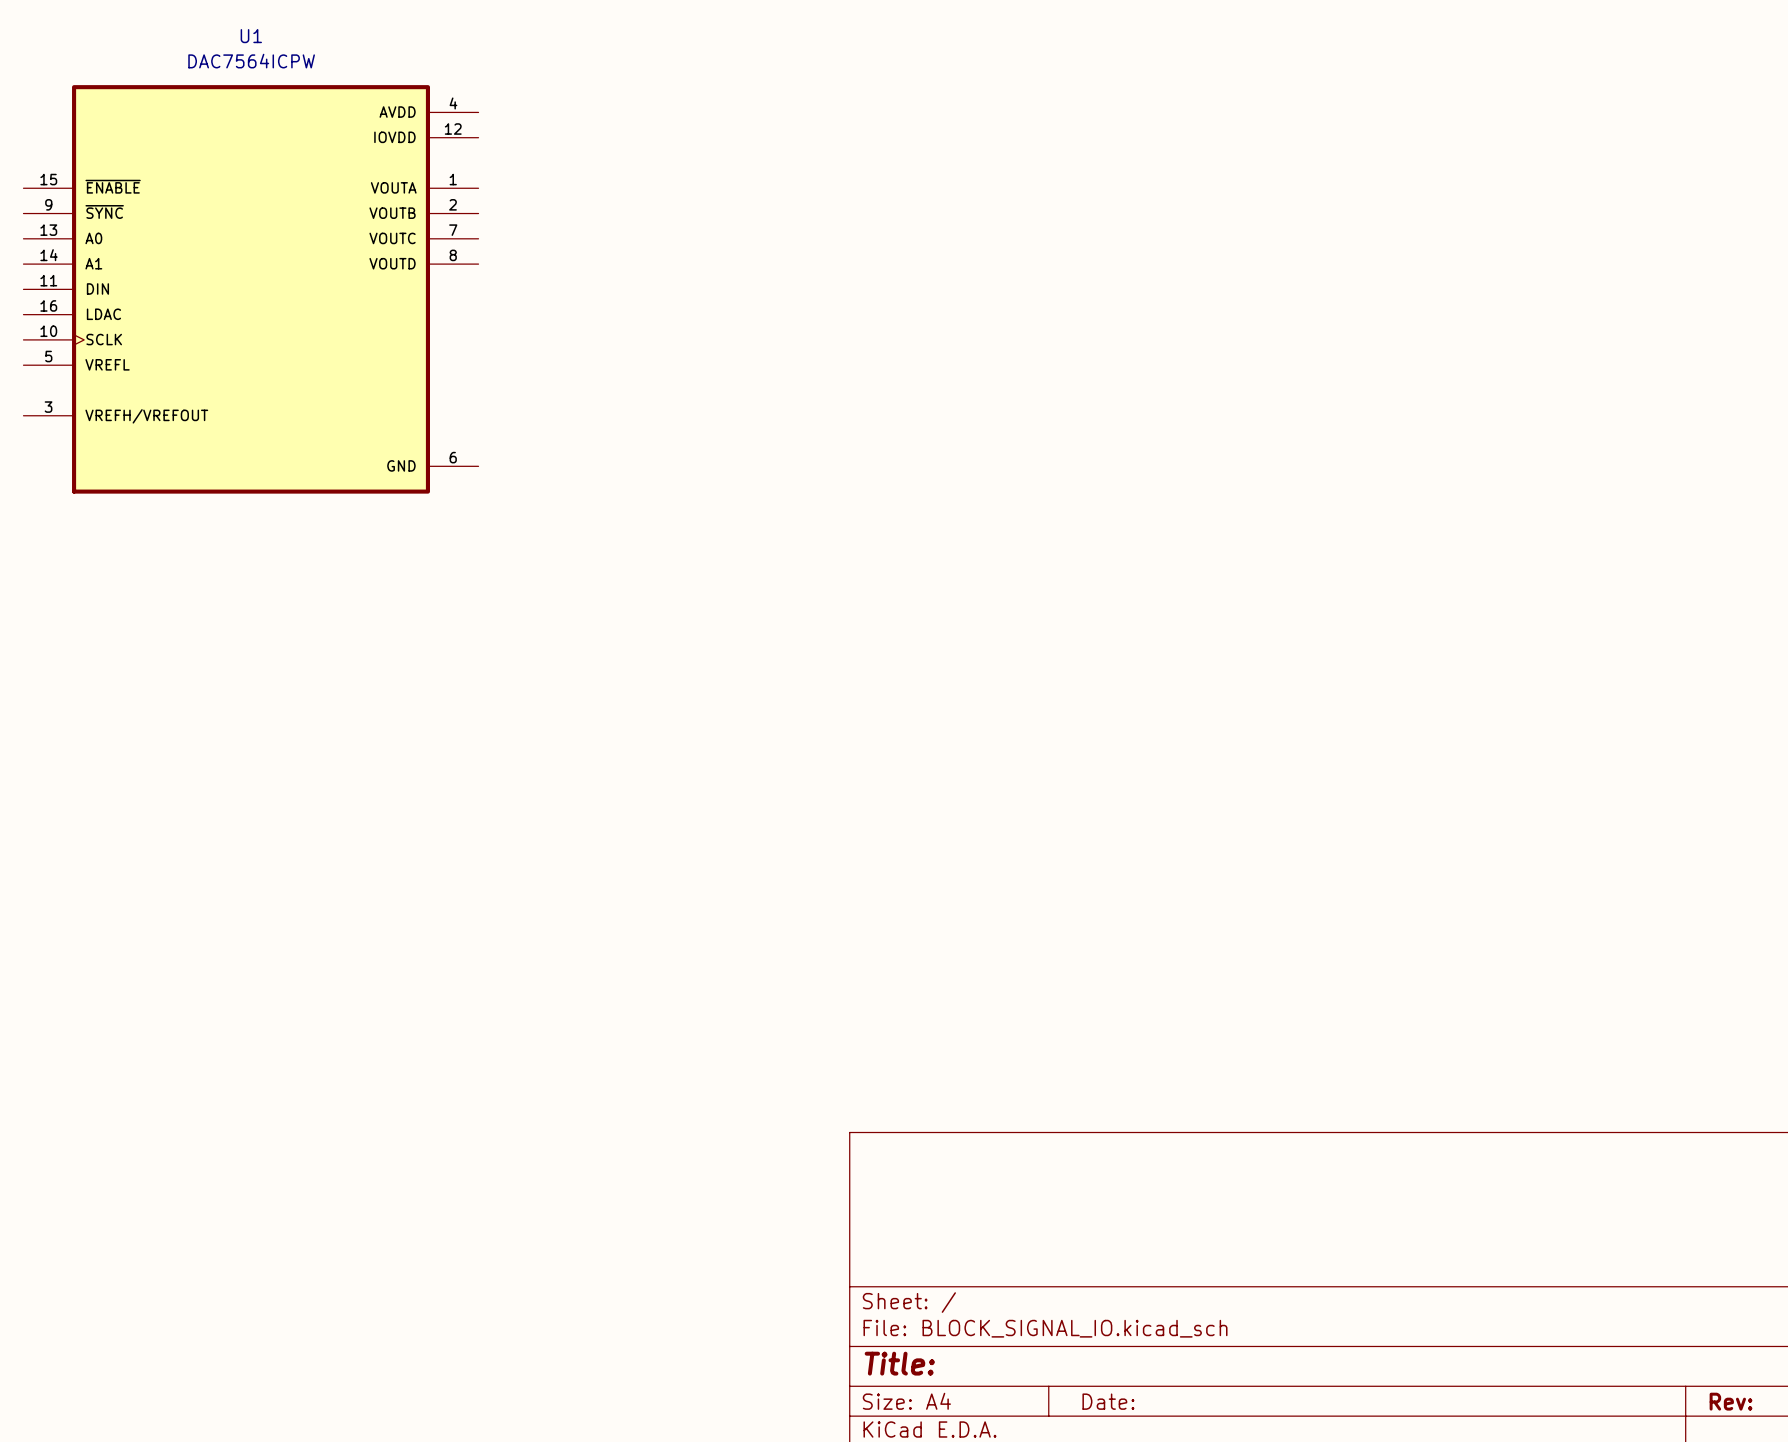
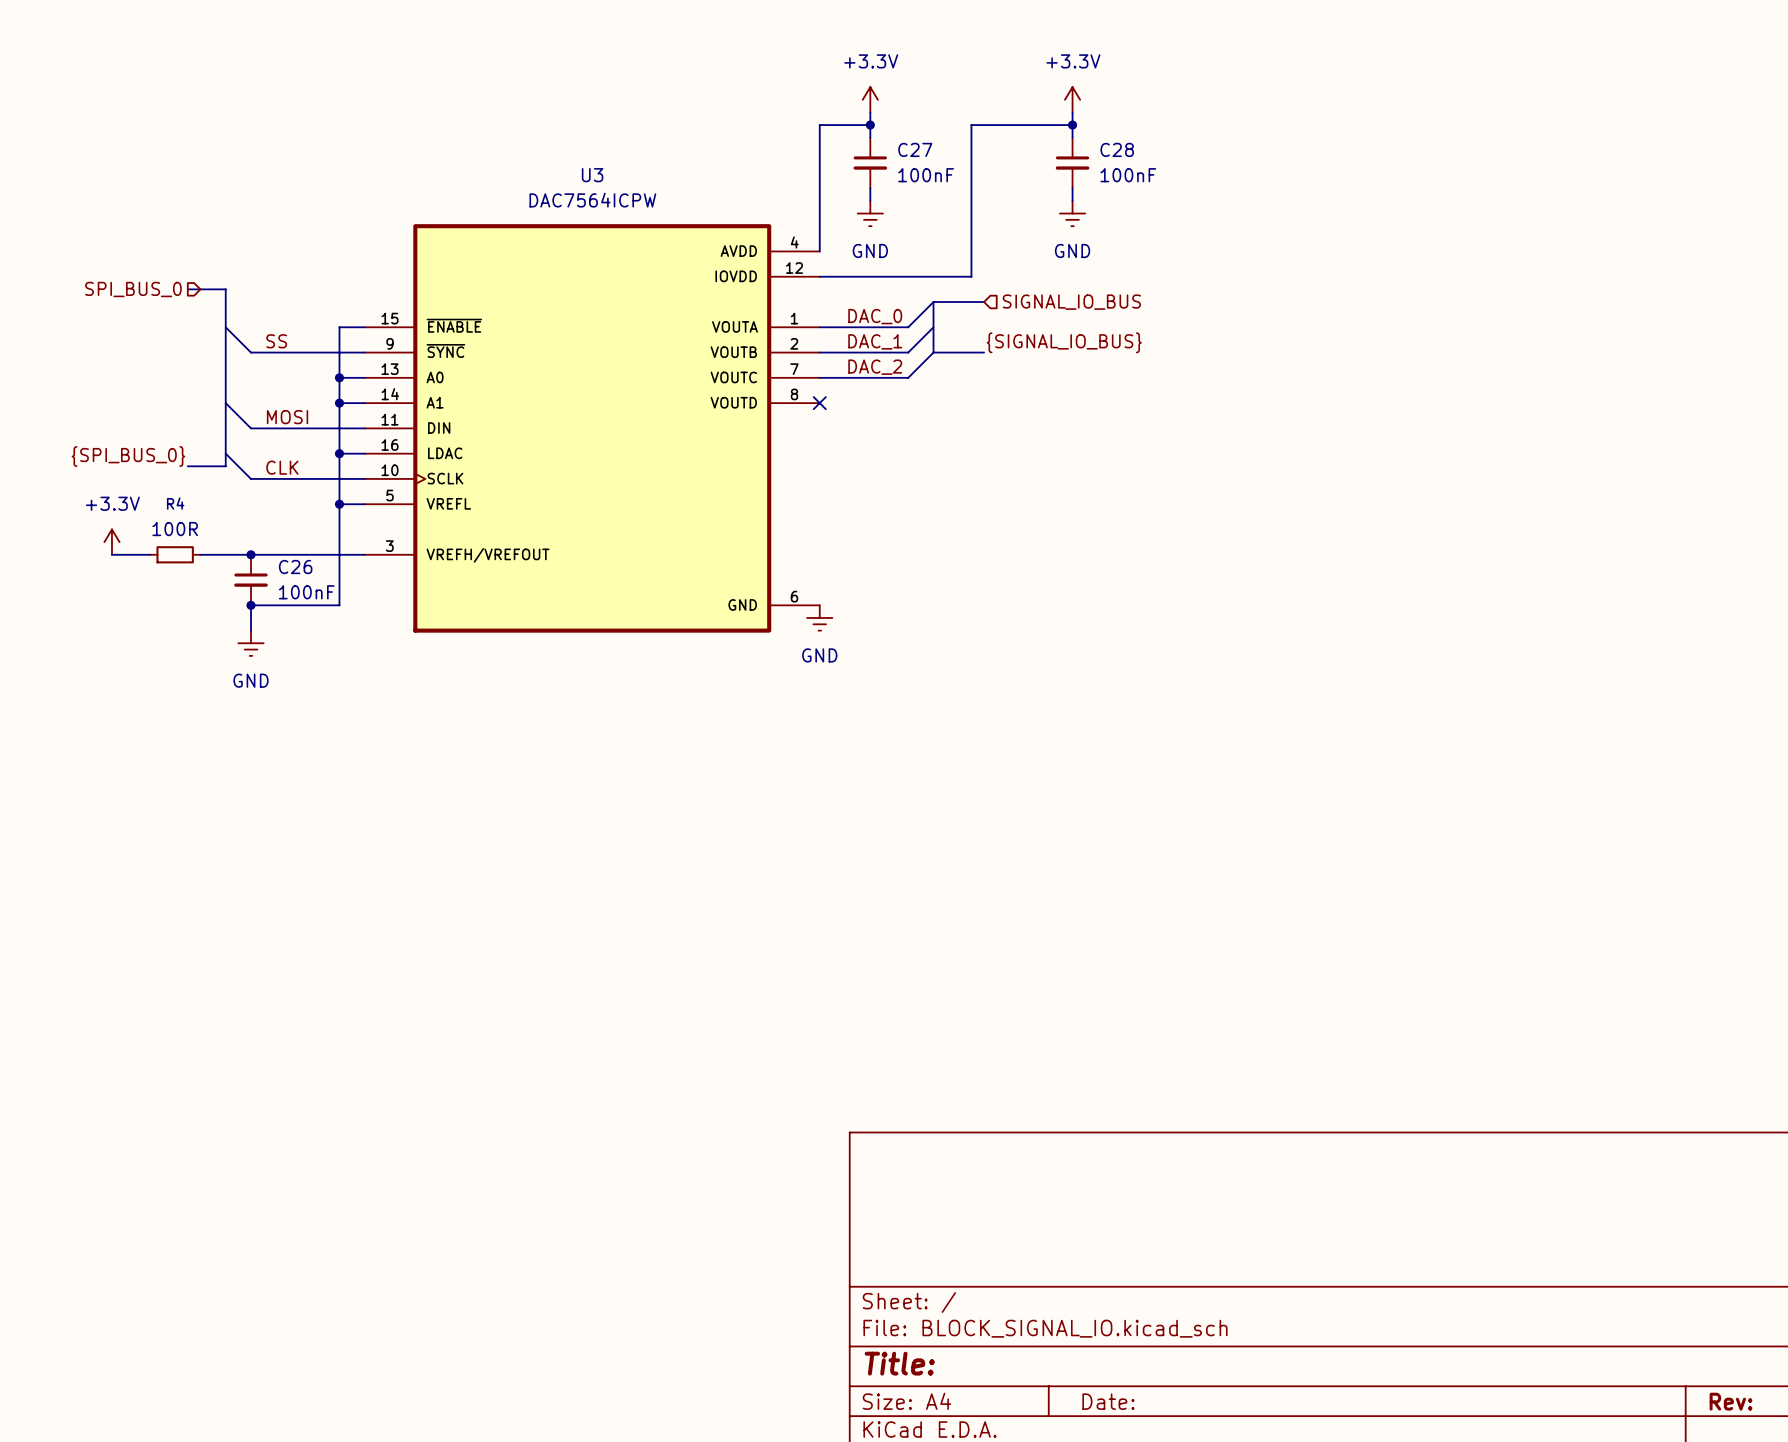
power symbol: none -> +3.3V (870, 99)
power symbol: none -> +3.3V (1072, 99)
wire: none -> (870, 112) (870, 137)
wire: none -> (1072, 112) (1072, 137)
wire: none -> (870, 125) (819, 125) (819, 251)
junction: none -> (870, 125)
wire: none -> (1072, 125) (971, 125) (971, 276) (819, 276)
junction: none -> (1072, 125)
C27: none -> 100nF (870, 162)
C28: none -> 100nF (1072, 162)
wire: none -> (870, 188) (870, 200)
wire: none -> (1072, 188) (1072, 200)
power symbol: none -> GND (870, 213)
power symbol: none -> GND (1072, 213)
hierarchical label: none -> SPI_BUS_0 (133, 289)
bus: none -> (187, 289) (225, 289) (225, 466) (187, 466)
U1: DAC7564ICPW (251, 289) -> none
wire: none -> (933, 302) (908, 327) (819, 327)
bus: none -> (984, 302) (933, 302) (933, 352) (984, 352)
hierarchical label: none -> SIGNAL_IO_BUS (1071, 302)
label: none -> DAC_0 (875, 316)
wire: none -> (364, 327) (339, 327) (339, 605) (251, 605) (251, 630)
wire: none -> (933, 327) (908, 352) (819, 352)
label: none -> SS (276, 341)
label: none -> DAC_1 (875, 341)
label: none -> {SIGNAL_IO_BUS} (1064, 342)
wire: none -> (933, 352) (908, 377) (819, 377)
label: none -> DAC_2 (875, 367)
junction: none -> (339, 377)
junction: none -> (339, 403)
no-connect mark: none -> (819, 403)
label: none -> MOSI (287, 417)
U3: none -> DAC7564ICPW (592, 428)
junction: none -> (339, 453)
label: none -> {SPI_BUS_0} (128, 456)
label: none -> CLK (282, 467)
wire: none -> (339, 504) (364, 504)
junction: none -> (339, 504)
power symbol: none -> +3.3V (111, 542)
wire: none -> (111, 554) (149, 554)
R4: none -> 100R (175, 554)
wire: none -> (200, 554) (364, 554)
junction: none -> (251, 554)
C26: none -> 100nF (251, 580)
junction: none -> (251, 605)
power symbol: none -> GND (819, 617)
power symbol: none -> GND (251, 643)

